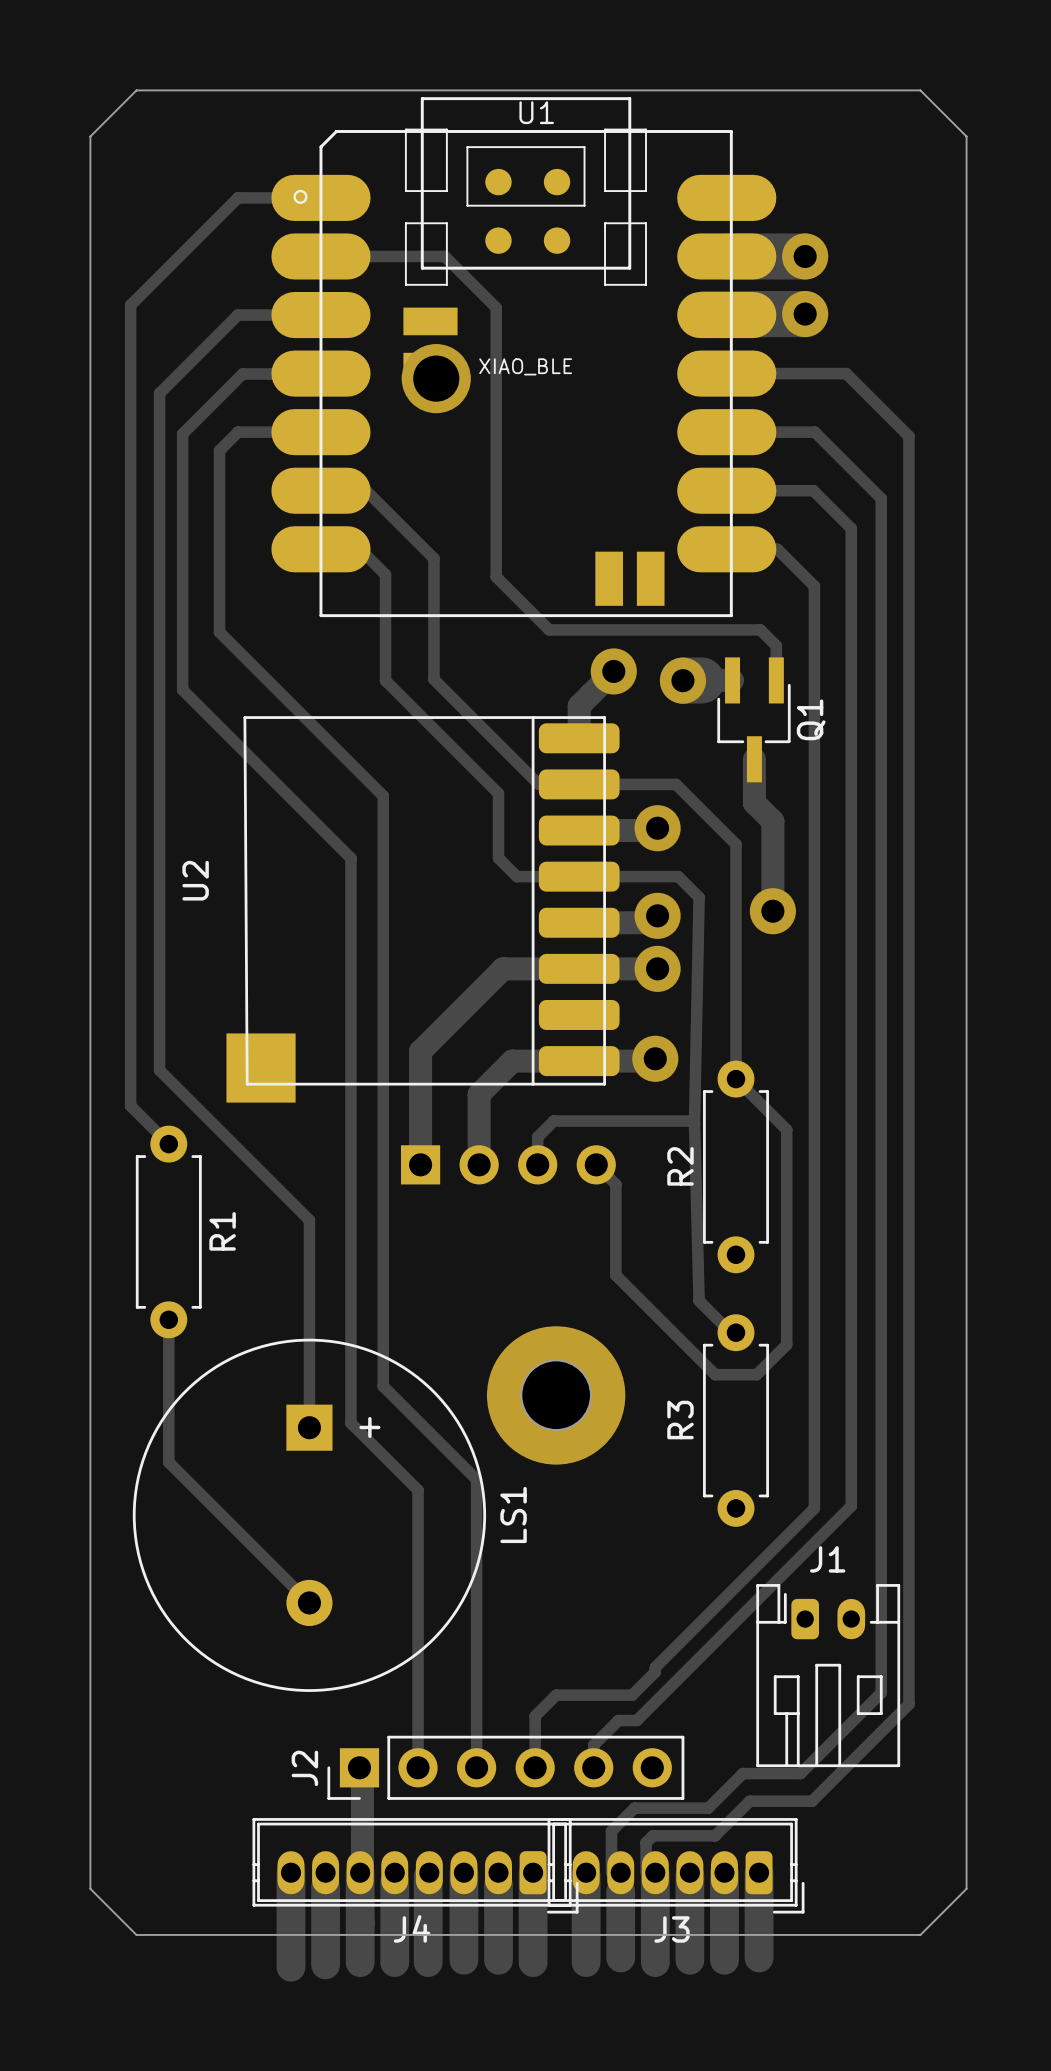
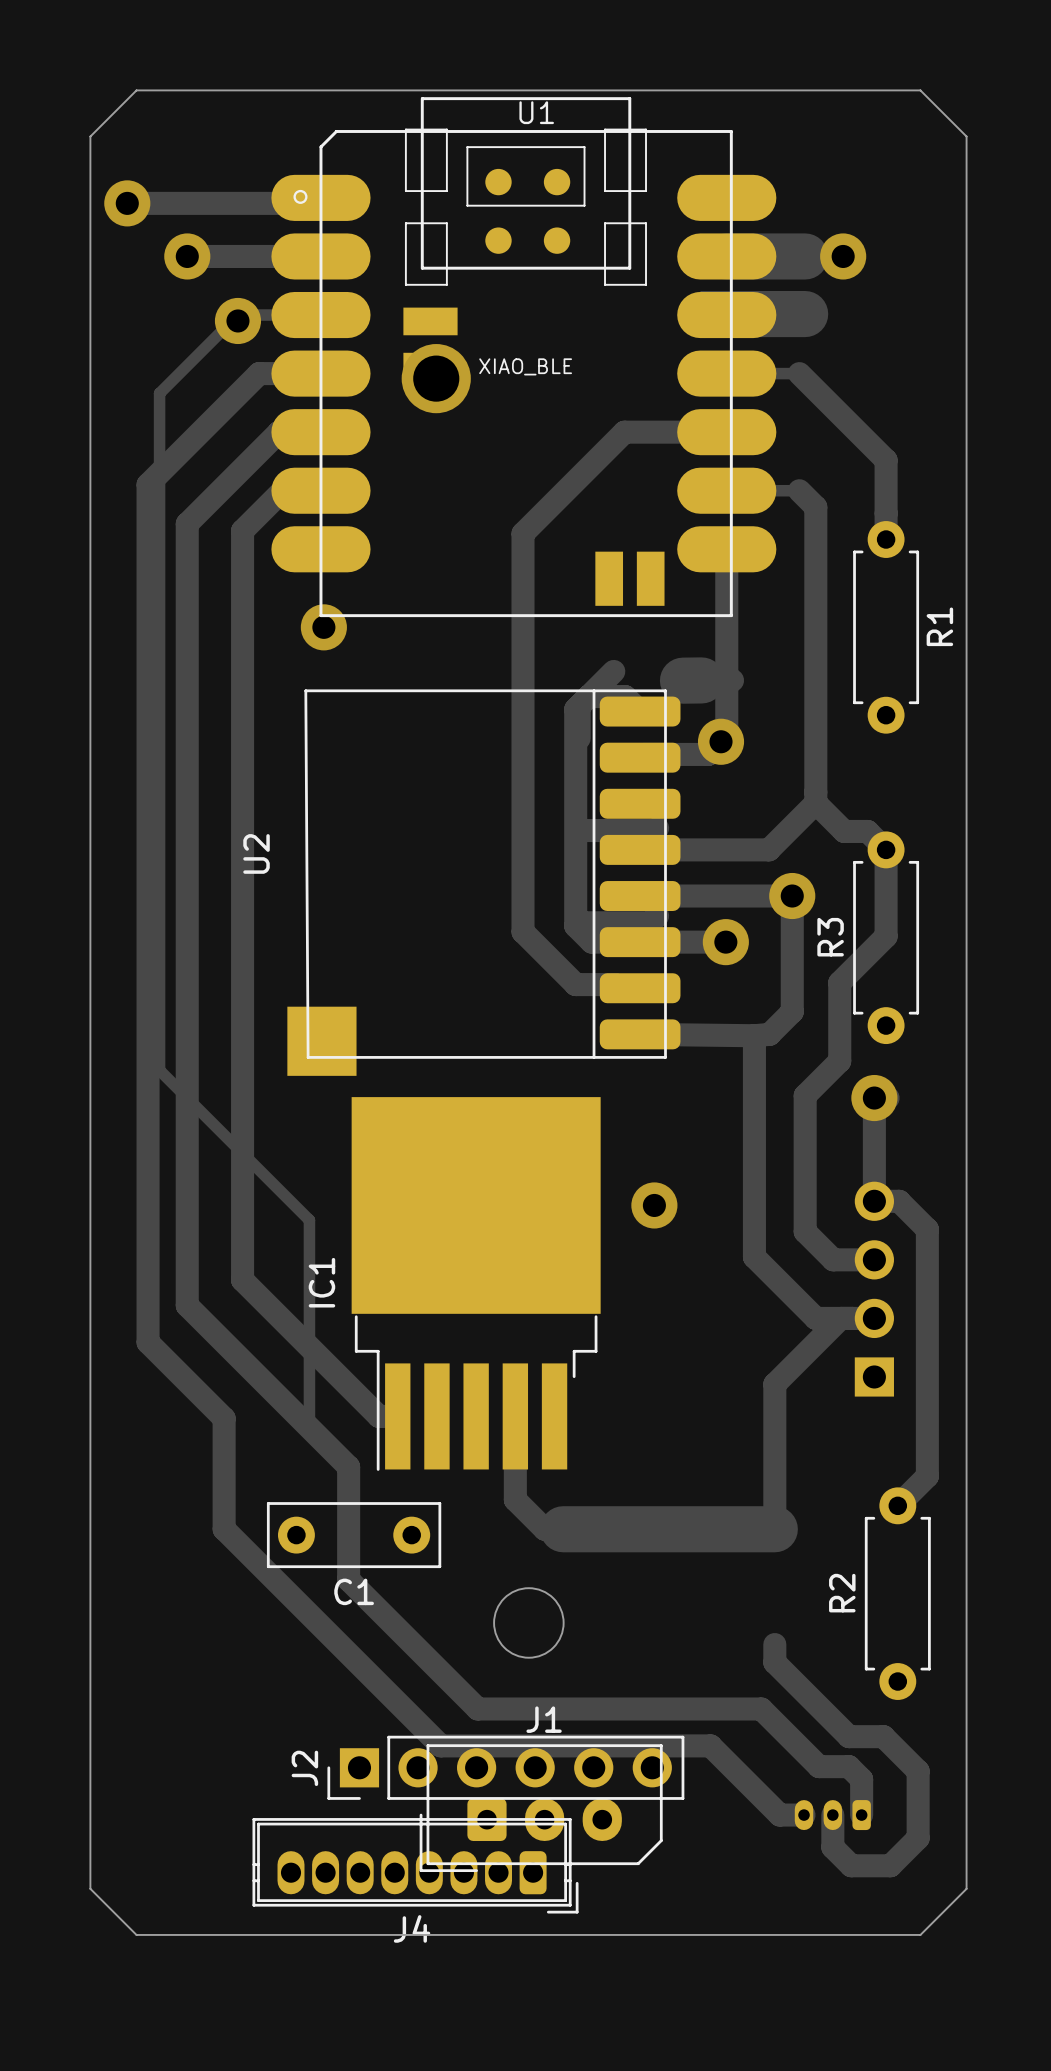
track: (299, 197) (237, 197) (130, 305) (130, 1105) (168, 1144) -> none
track: none -> (320, 197) (315, 203) (127, 203)
via: none -> (127, 203)
track: none -> (187, 256) (299, 256)
via: none -> (187, 256)
track: (320, 256) (444, 256) (496, 307) (496, 576) (549, 629) (760, 629) (776, 645) (776, 680) -> none
via: (805, 256) -> none
via: none -> (843, 256)
via: (805, 314) -> none
via: none -> (237, 320)
track: (272, 373) (242, 374) (182, 433) (182, 689) (350, 858) (350, 1423) (418, 1490) (418, 1767) -> (272, 373) (259, 373) (148, 484) (148, 1342) (224, 1418) (224, 1529) (440, 1745) (710, 1745) (779, 1815) (804, 1815)
track: (799, 373) (846, 373) (908, 436) (908, 1704) (812, 1801) (749, 1801) (715, 1835) (652, 1835) (646, 1842) (646, 1872) -> (799, 373) (886, 460) (886, 539)
track: (278, 432) (237, 432) (219, 450) (219, 632) (383, 795) (383, 1386) (476, 1479) (476, 1767) -> (278, 432) (187, 523) (187, 1305) (348, 1466) (348, 1579) (477, 1709) (761, 1709) (819, 1766) (848, 1766) (861, 1779) (861, 1815)
track: none -> (690, 432) (624, 432) (523, 533) (523, 931) (575, 984) (615, 984) (618, 988) (640, 988)
track: (726, 432) (814, 432) (881, 498) (881, 1692) (800, 1773) (742, 1773) (708, 1808) (634, 1808) (611, 1831) (611, 1872) -> none
track: none -> (289, 490) (282, 490) (242, 530) (242, 1280) (378, 1416) (397, 1416)
track: (320, 490) (366, 490) (433, 558) (433, 679) (538, 784) (676, 784) (736, 844) (736, 1079) (786, 1129) (786, 1344) (756, 1374) (715, 1374) (615, 1275) (615, 1184) (596, 1164) -> none
track: (799, 490) (813, 490) (851, 528) (851, 1506) (636, 1720) (618, 1720) (593, 1745) (593, 1767) -> (799, 490) (815, 507) (815, 803)
track: (299, 549) (360, 549) (385, 574) (385, 680) (498, 793) (498, 858) (516, 876) (678, 876) (699, 897) (694, 1123) -> none
track: (690, 549) (777, 549) (814, 586) (814, 1508) (655, 1667) (655, 1672) (632, 1695) (556, 1695) (535, 1716) (535, 1767) -> none
track: none -> (726, 549) (726, 736) (708, 754) (643, 754) (640, 757)
via: none -> (323, 627)
via: (613, 671) -> none
via: (682, 680) -> none
track: none -> (640, 711) (625, 696) (588, 696) (575, 709) (575, 926) (591, 942) (725, 942)
Q1: (753, 719) -> none
via: none -> (721, 741)
track: (754, 759) (754, 802) (772, 821) (772, 913) -> none
track: none -> (815, 803) (844, 831) (867, 831) (886, 849) (886, 936) (839, 982) (839, 1061) (805, 1095) (805, 1231) (833, 1259) (874, 1259)
track: none -> (815, 803) (768, 849) (640, 849)
via: (657, 828) -> none
track: none -> (640, 896) (792, 896) (792, 1011) (769, 1034) (754, 1035)
U2 position: (423, 909) -> (483, 882)
via position: (772, 911) -> (792, 896)
via: (657, 915) -> none
via: none -> (725, 942)
track: (657, 968) (503, 968) (420, 1051) (420, 1164) -> none
via: (657, 968) -> none
track: none -> (640, 1034) (754, 1035)
track: none -> (754, 1035) (754, 1257) (815, 1318) (874, 1318)
track: (655, 1058) (652, 1061) (512, 1061) (479, 1094) (479, 1164) -> none
via: (655, 1058) -> none
via: none -> (874, 1098)
track: none -> (888, 1098) (874, 1098) (874, 1201) (899, 1201) (927, 1229) (927, 1476) (897, 1505)
track: (694, 1123) (692, 1121) (553, 1121) (537, 1137) (537, 1164) -> none
track: (694, 1123) (699, 1300) (730, 1332) (736, 1332) -> none
part rotation: 0° (508, 1164) -> 90° counterclockwise (874, 1289)
part position: (508, 1164) -> (874, 1289)
R2 position: (736, 1166) -> (897, 1593)
via: none -> (654, 1205)
R1 position: (168, 1231) -> (886, 627)
IC1: none -> (476, 1283)
track: none -> (840, 1318) (774, 1384) (774, 1529) (544, 1529) (515, 1499) (515, 1416)
track: (168, 1319) (168, 1462) (309, 1602) -> none
round board edge position: (556, 1395) -> (528, 1622)
via: (556, 1395) -> none
R3 position: (736, 1420) -> (886, 937)
LS1: (309, 1515) -> none
C1: none -> (354, 1535)
J1 footprint: [756, 1584, 901, 1768] -> [419, 1744, 663, 1873]
track: none -> (774, 1644) (774, 1662) (848, 1736) (883, 1736) (918, 1771) (918, 1838) (890, 1865) (851, 1865) (832, 1847) (832, 1815)
track: (359, 1767) (362, 1770) (362, 1870) -> none
part: none -> (832, 1815)
J3: (676, 1865) -> none
track: (291, 1872) (291, 1967) -> none
track: (360, 1872) (360, 1962) -> none
track: (463, 1872) (463, 1960) -> none
track: (533, 1872) (533, 1962) -> none
track: (724, 1872) (724, 1960) -> none
track: (759, 1872) (759, 1958) -> none
track: (586, 1875) (586, 1962) -> none
track: (655, 1875) (655, 1962) -> none
track: (689, 1875) (689, 1960) -> none
track: (428, 1876) (428, 1962) -> none
track: (394, 1881) (394, 1962) -> none
track: (498, 1884) (498, 1960) -> none
track: (325, 1886) (325, 1964) -> none
track: (620, 1891) (620, 1958) -> none

